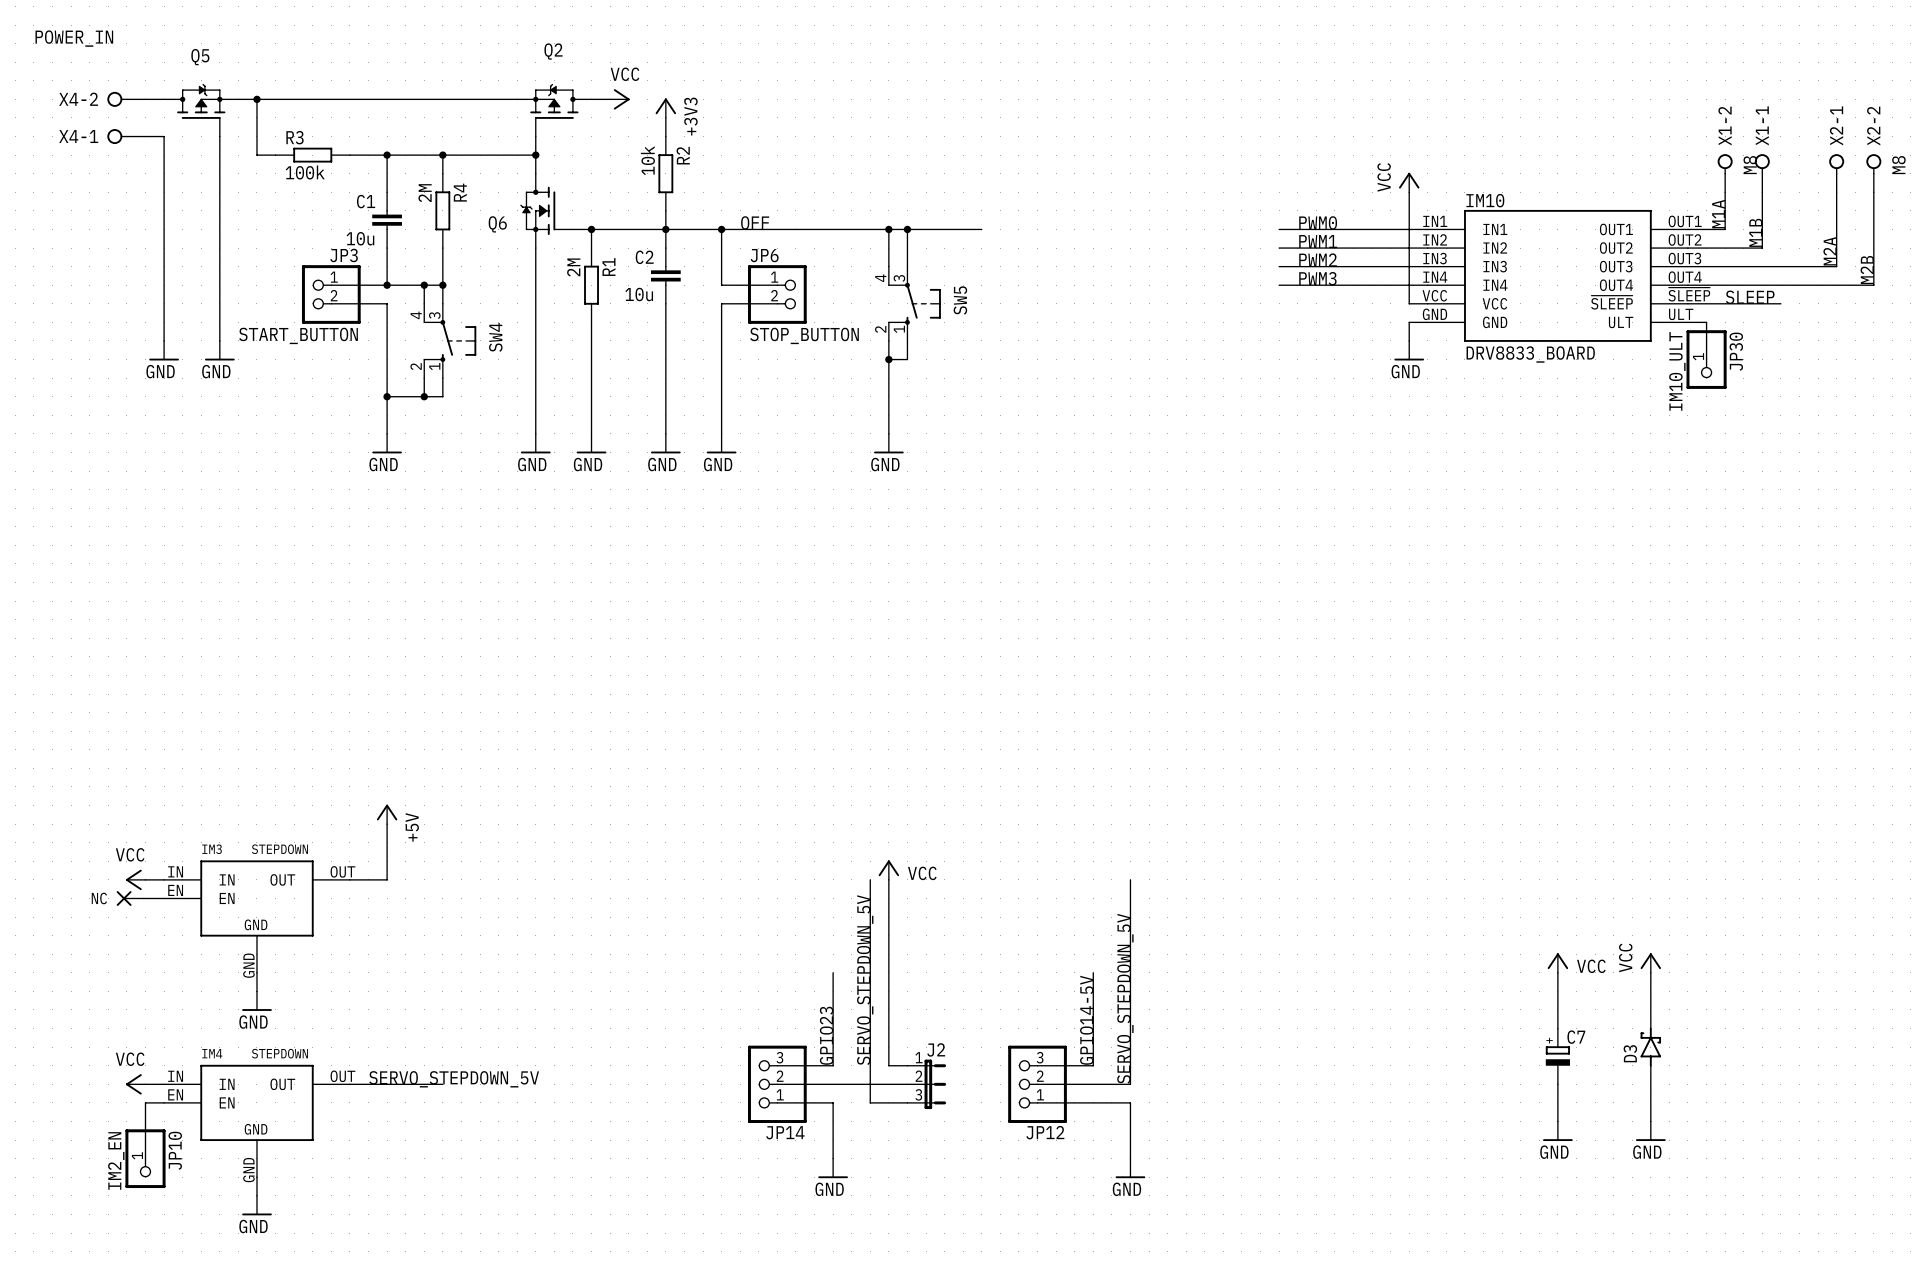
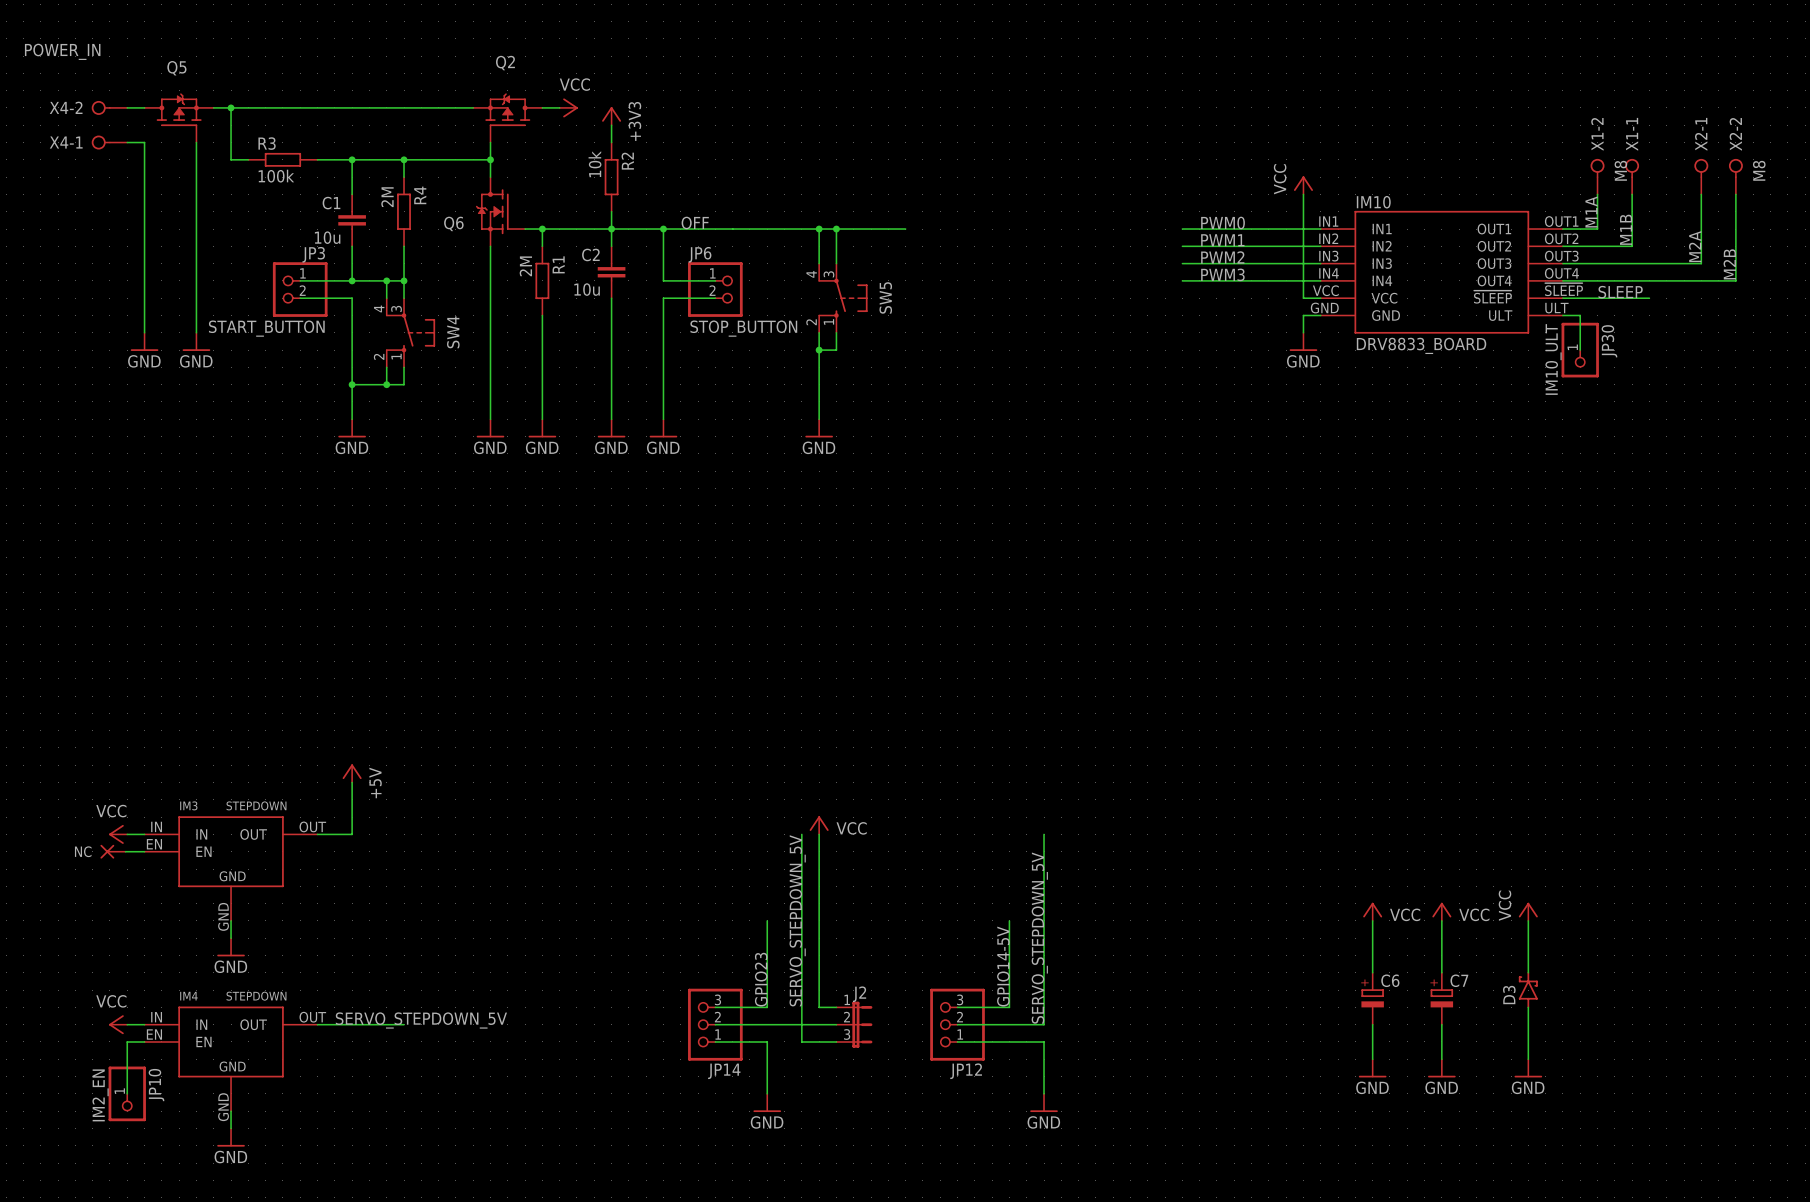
power symbol: none -> VCC (1372, 911)
wire: none -> (1372, 920) (1372, 972)
C6: none -> (1372, 998)
wire: none -> (1372, 1024) (1372, 1059)
power symbol: none -> GND (1372, 1068)

